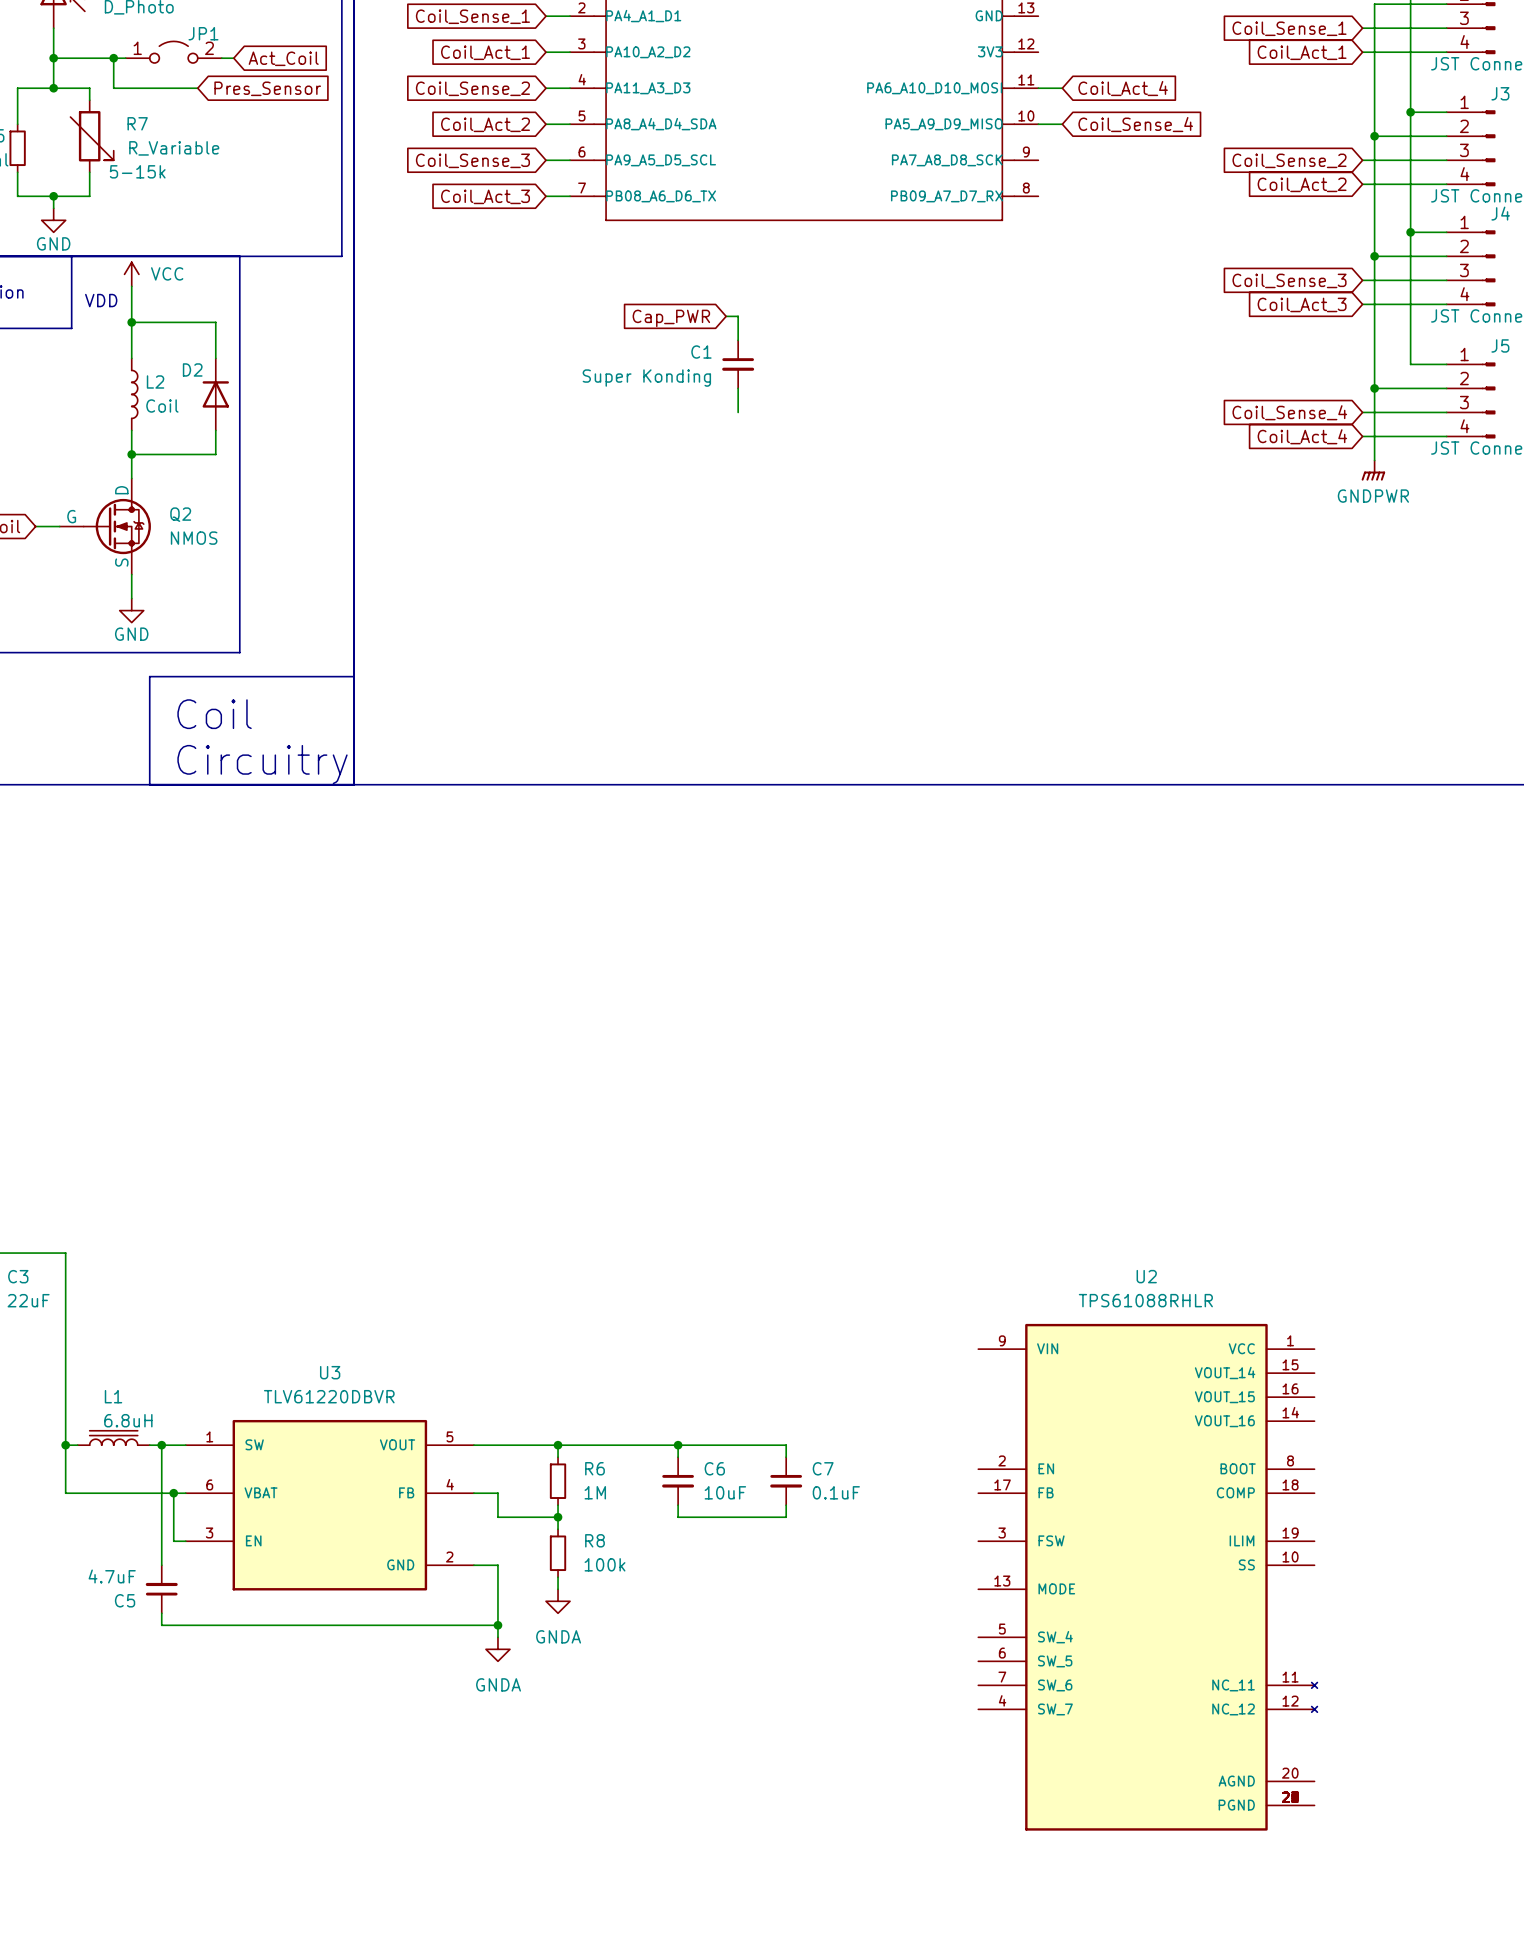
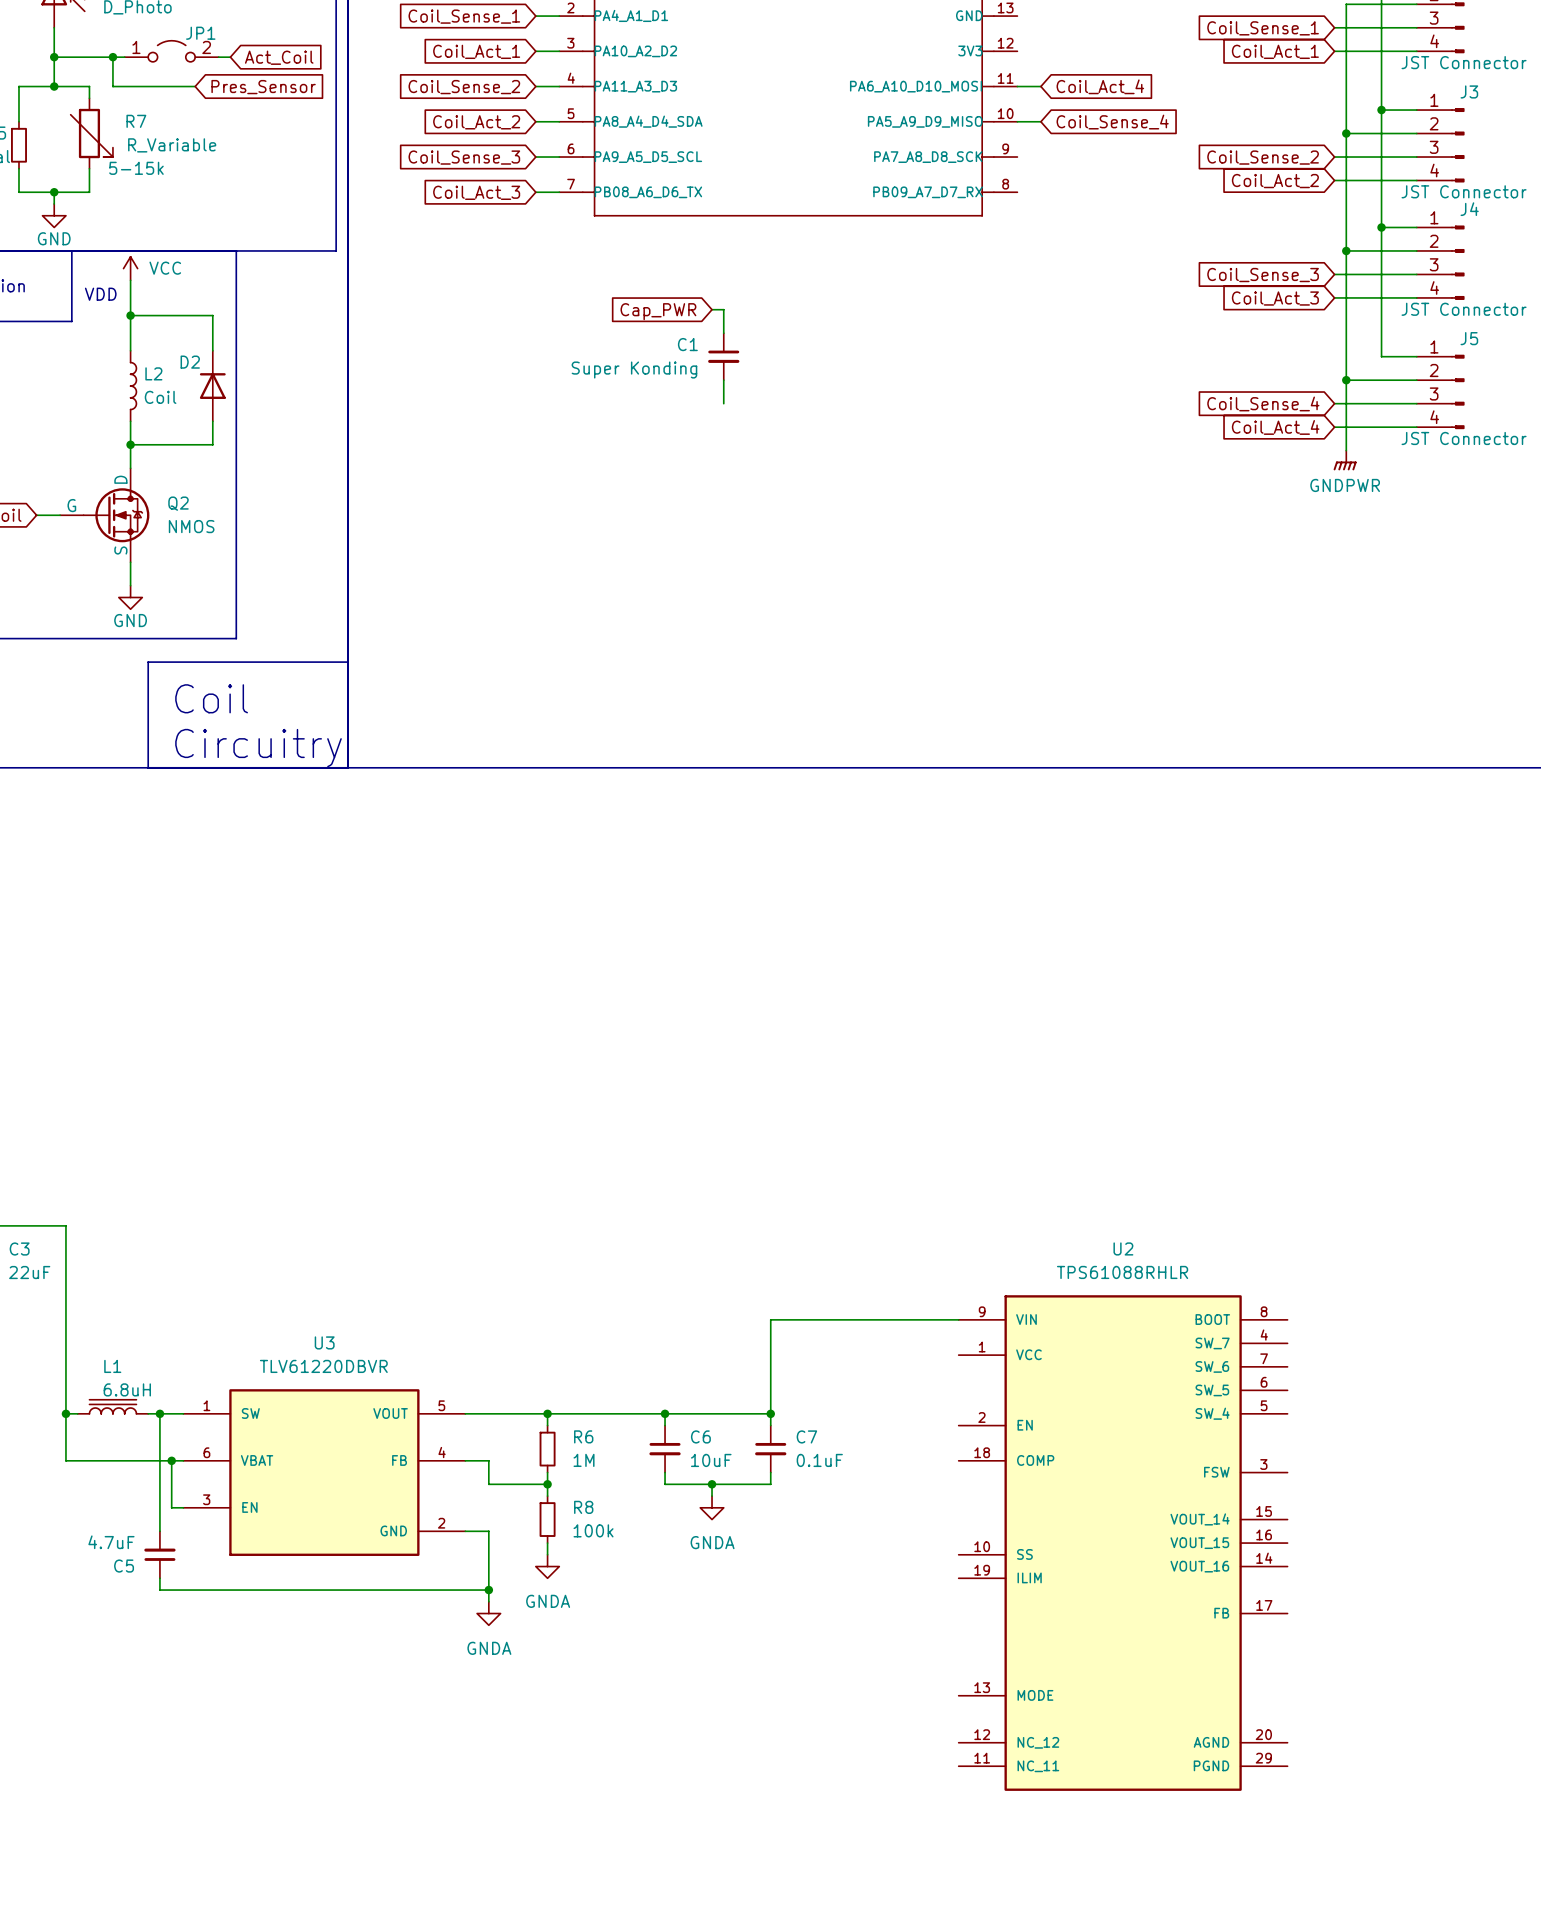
U2 symbol: [978, 1323, 1318, 1831] -> [958, 1295, 1288, 1791]
wire: none -> (958, 1319) (770, 1319) (770, 1413)
junction: none -> (770, 1413)
wire: none -> (712, 1484) (712, 1496)
junction: none -> (712, 1484)
power symbol: none -> GNDA (712, 1507)

